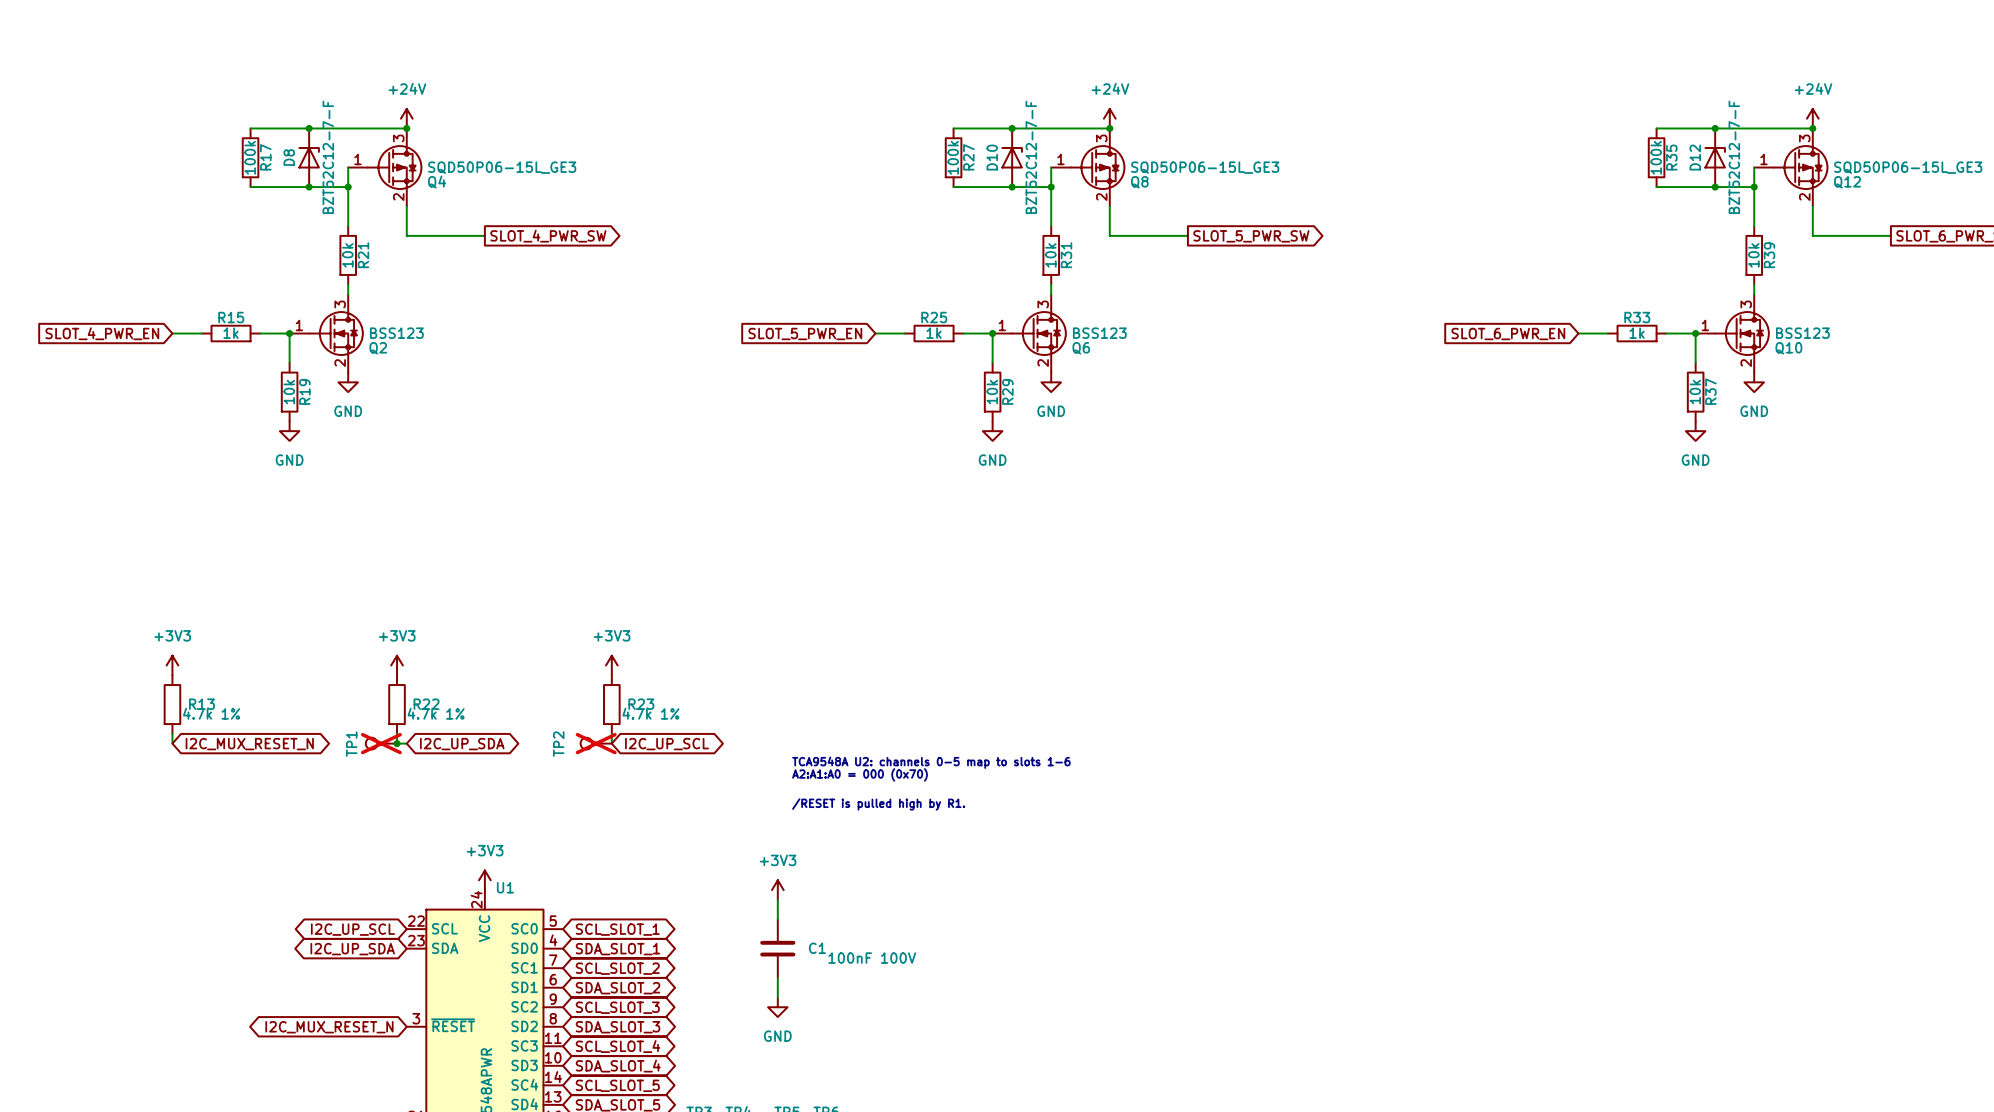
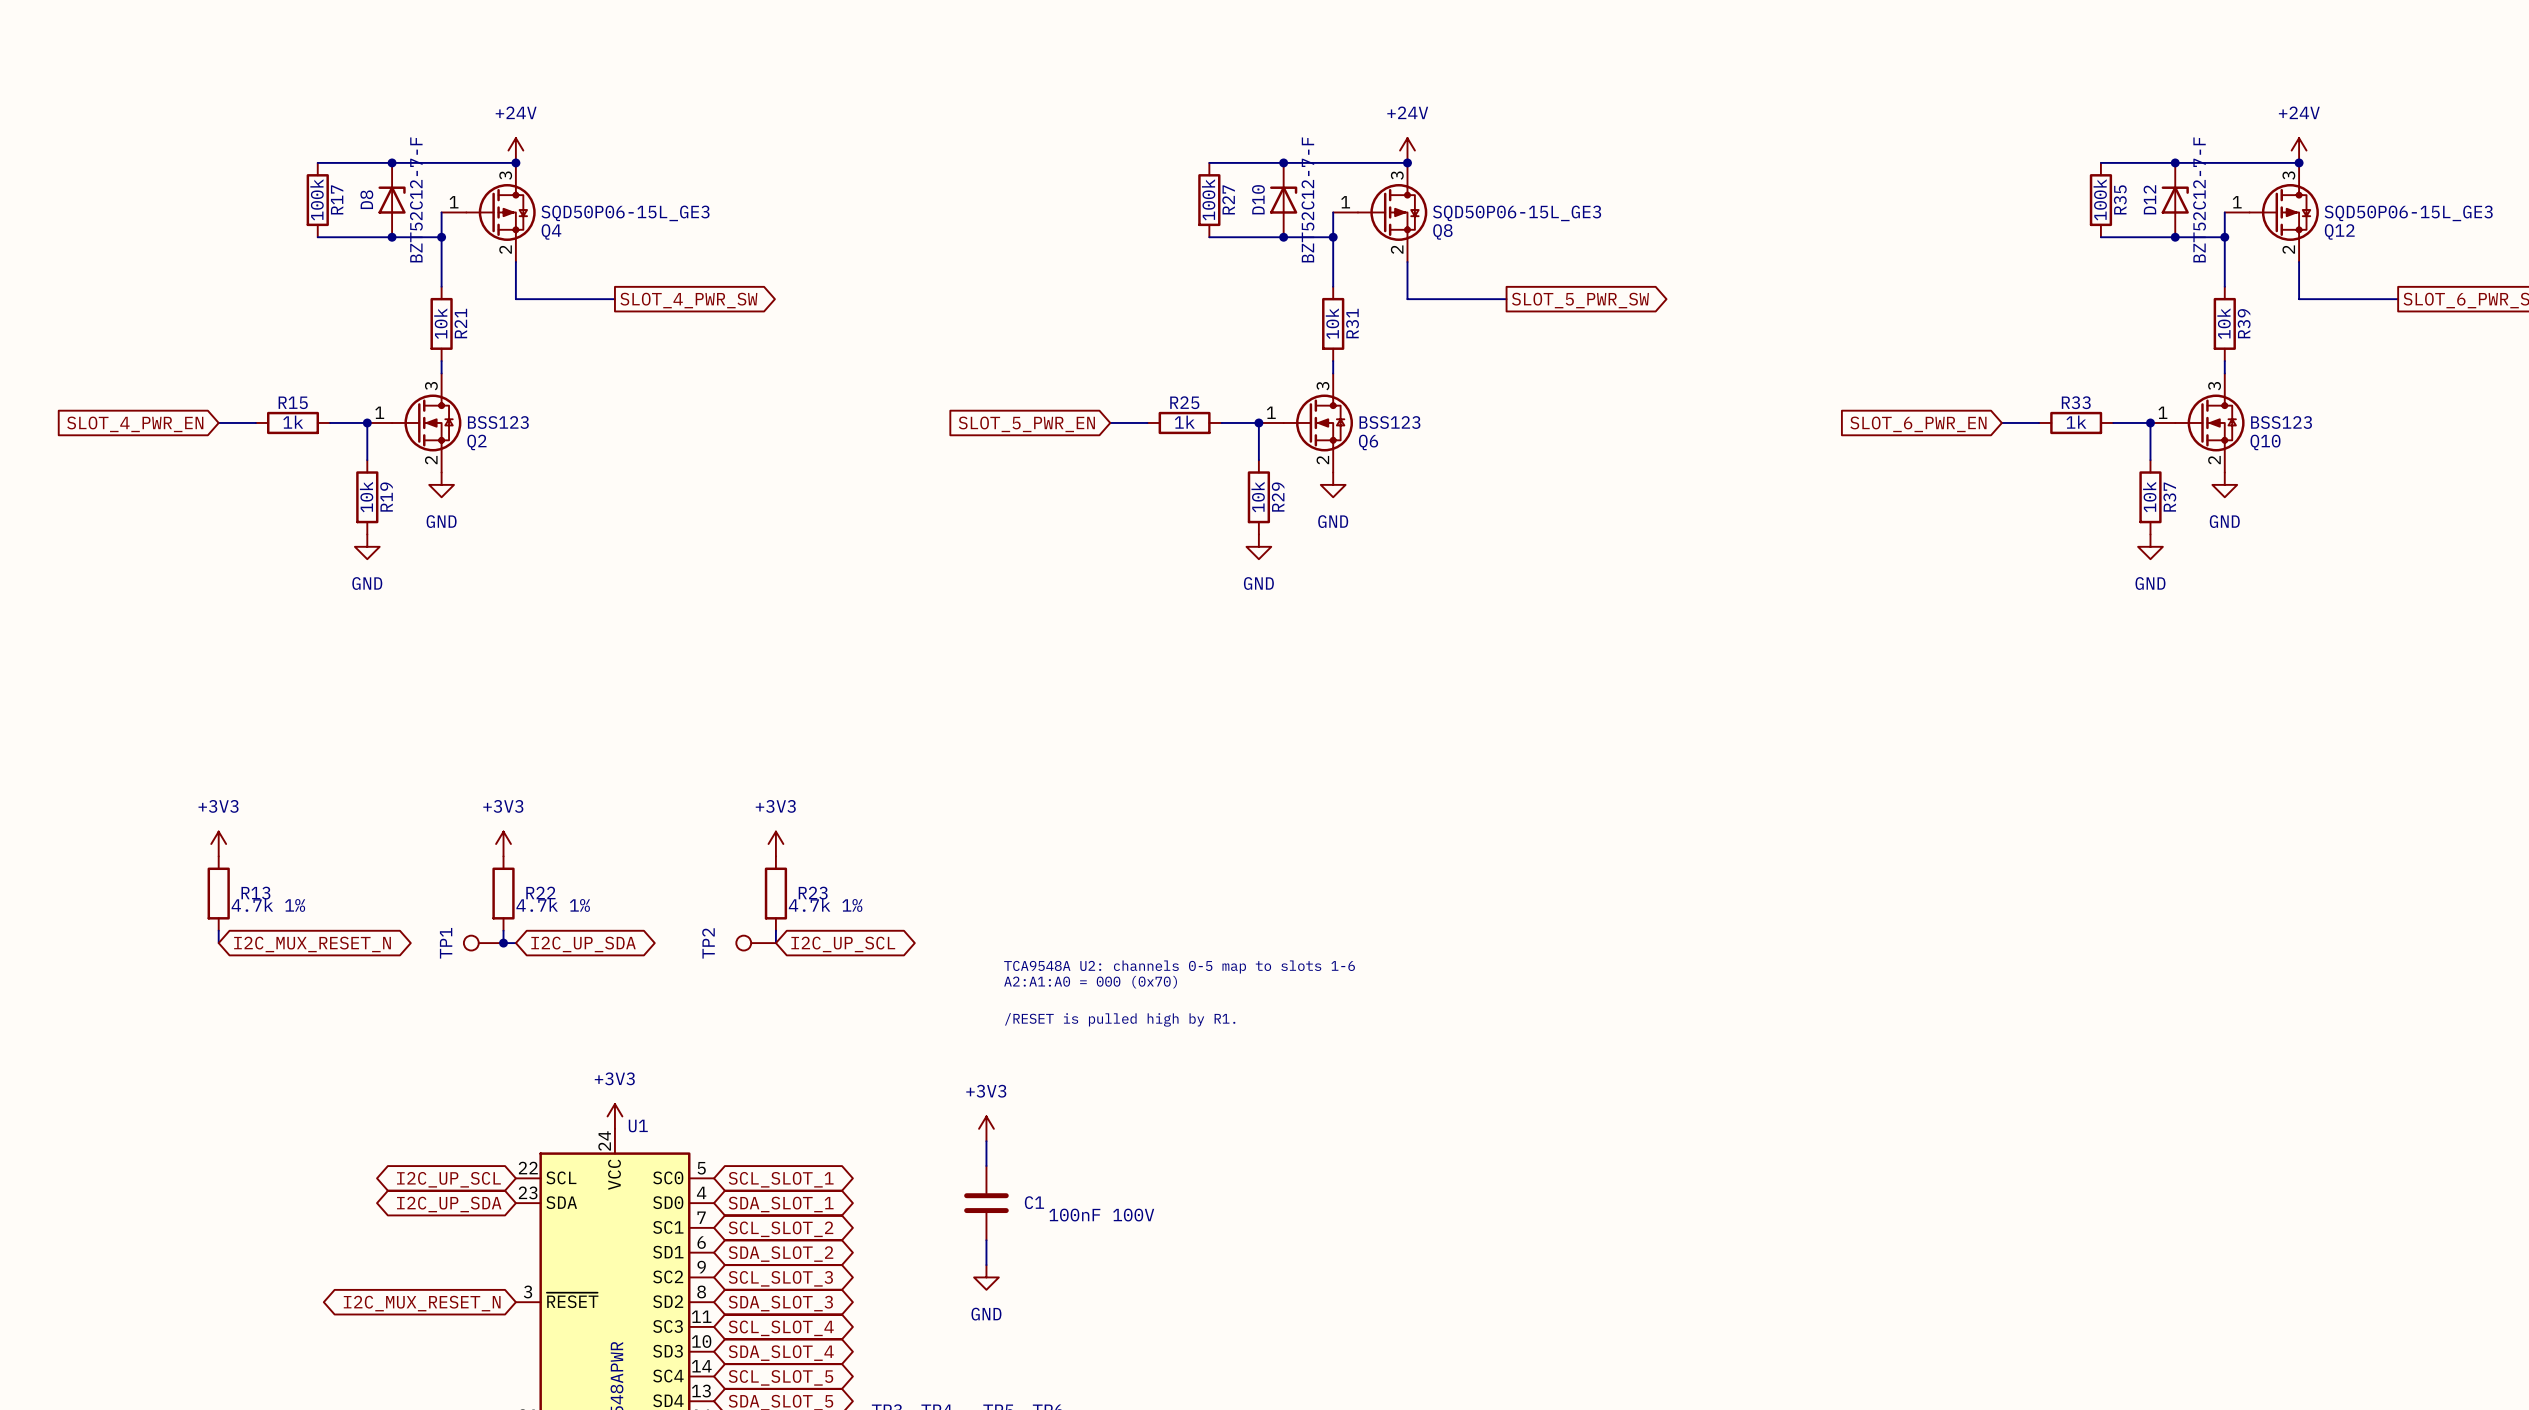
TP1 do-not-place cross: (381, 743) -> none
TP2 do-not-place cross: (596, 743) -> none

